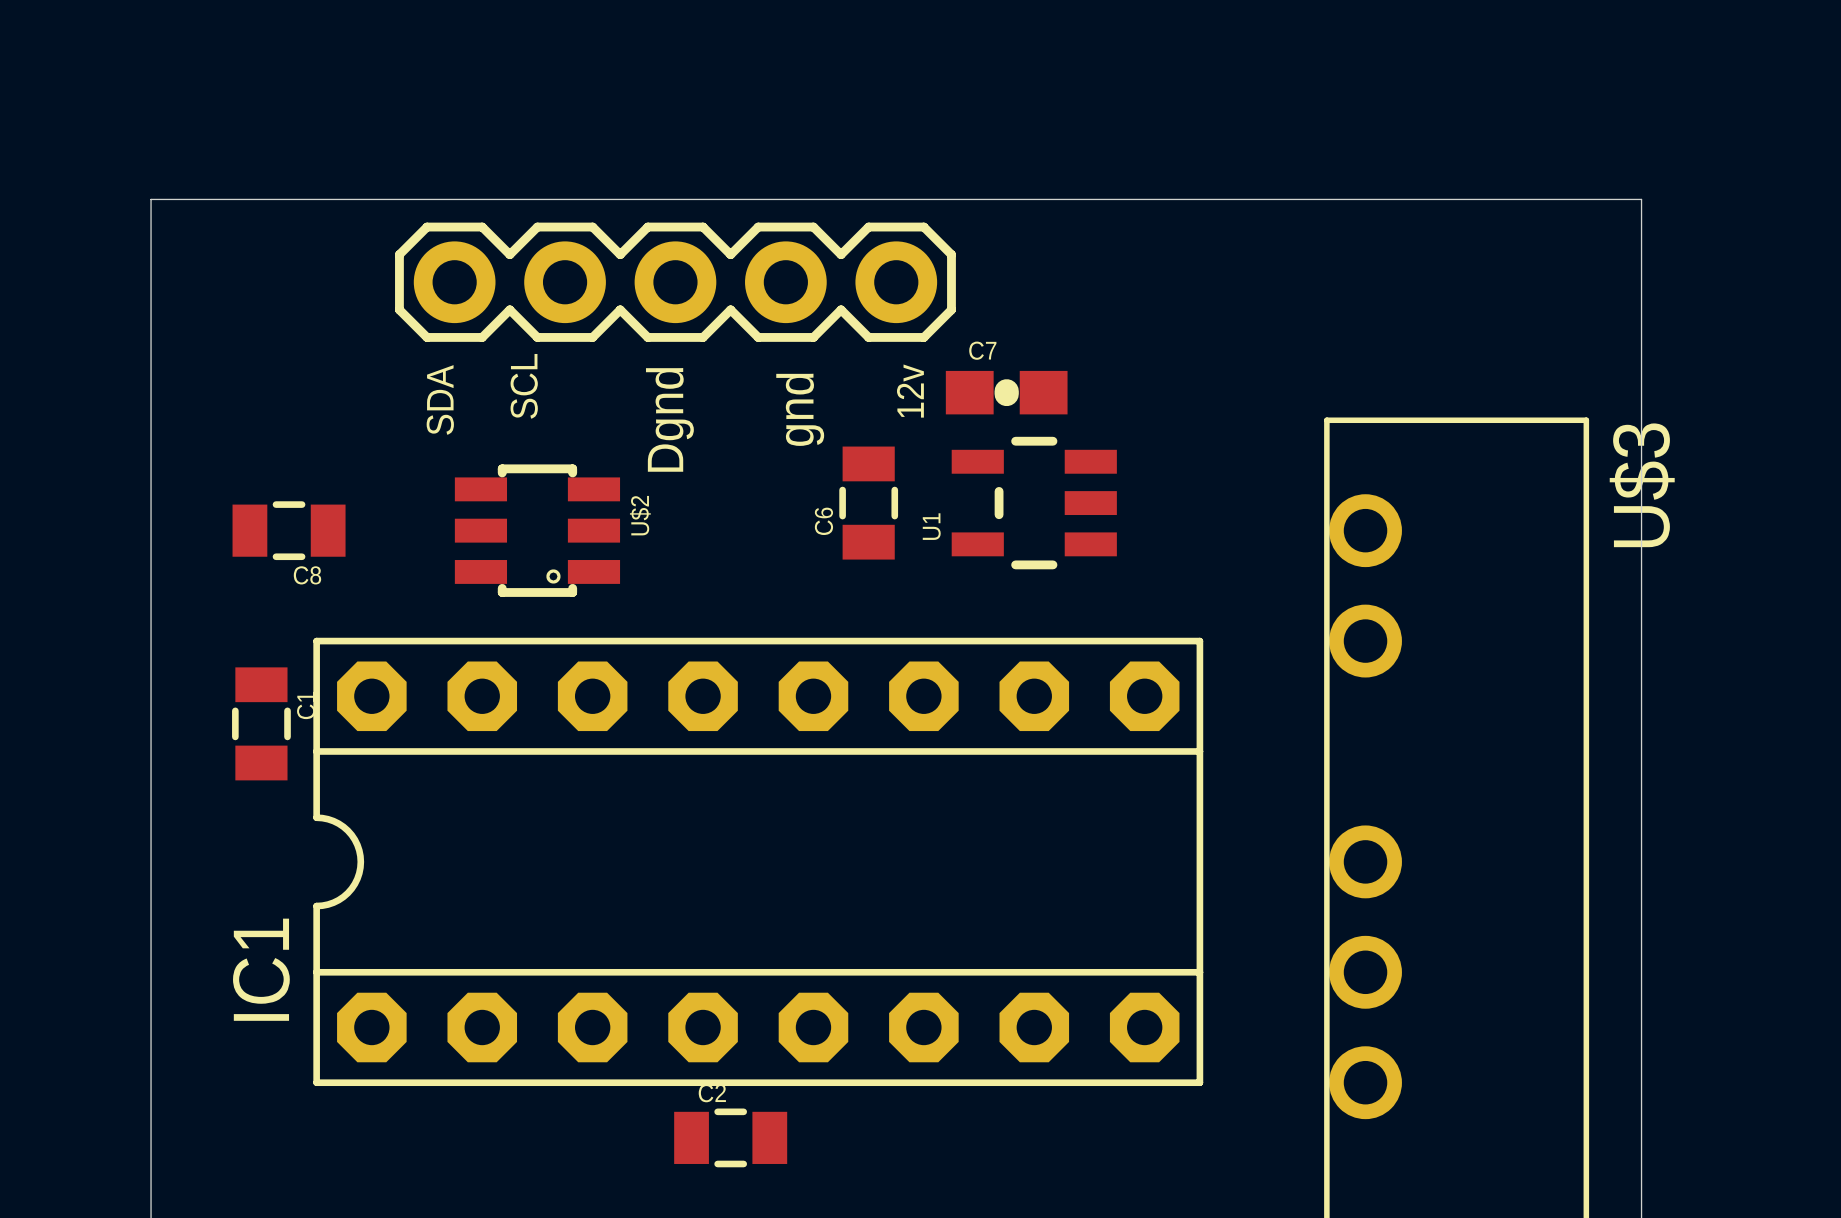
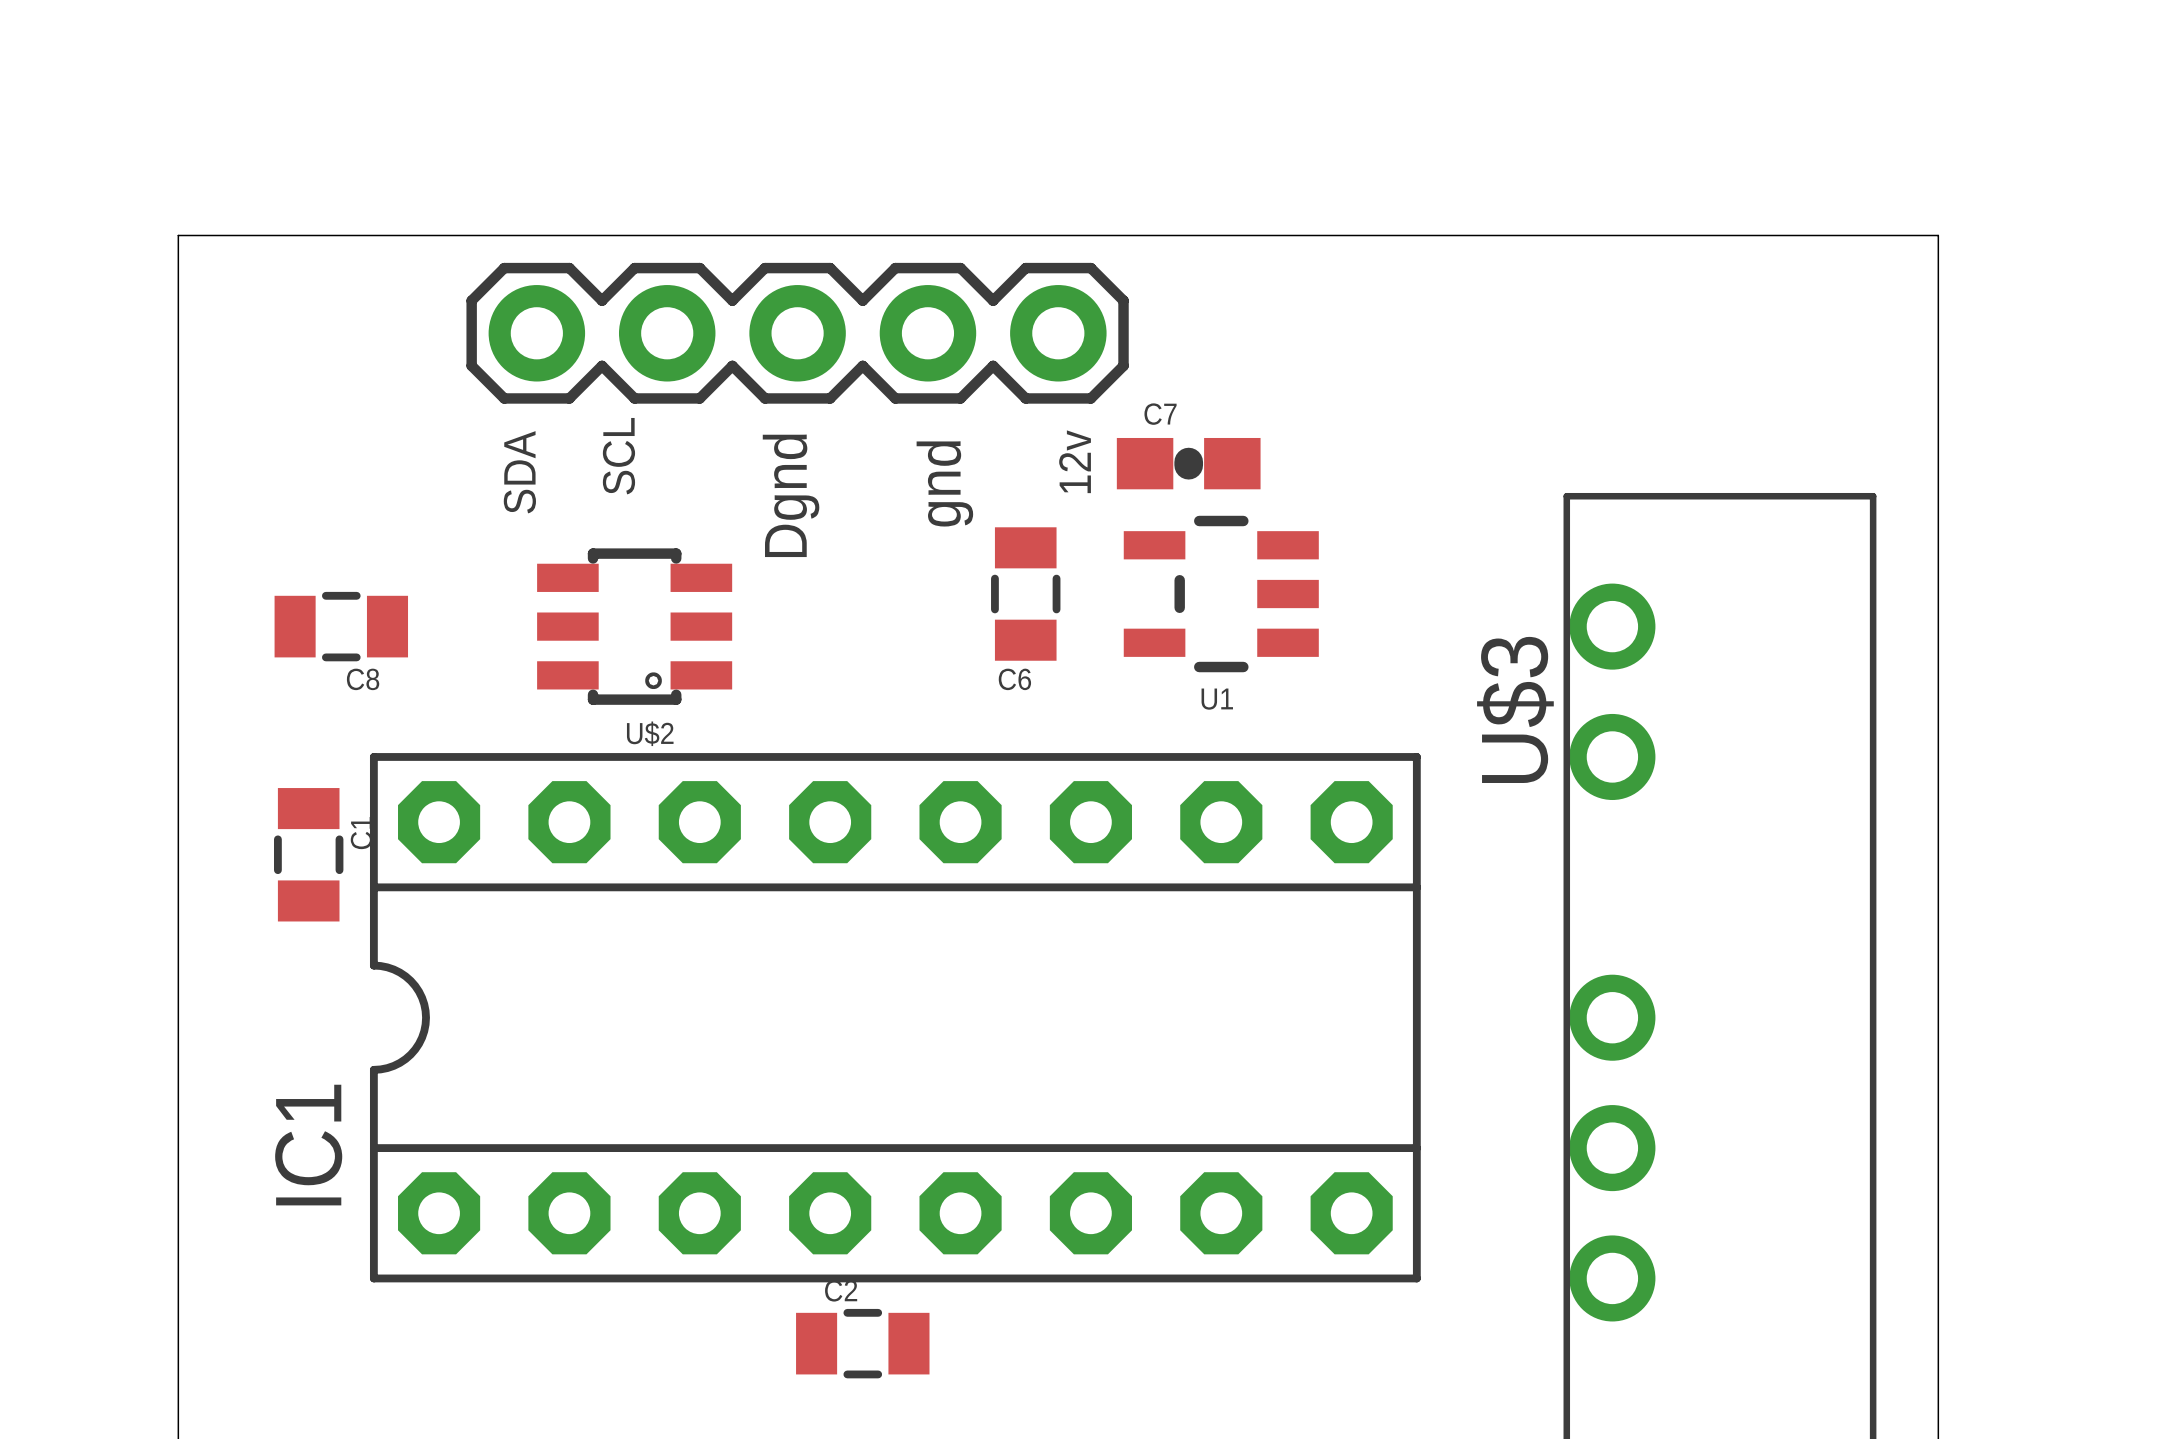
U$3 name position: U$3 (1642, 485) -> U$3 (1515, 709)
U$2 name rotation: 0° (640, 515) -> 90° clockwise (650, 733)
U$2 name position: U$2 (640, 515) -> U$2 (650, 733)
C6 name rotation: 0° (823, 521) -> 90° clockwise (1014, 679)
C6 name position: C6 (823, 521) -> C6 (1014, 679)
U1 name rotation: 0° (931, 526) -> 90° clockwise (1217, 699)
U1 name position: U1 (931, 526) -> U1 (1217, 699)

